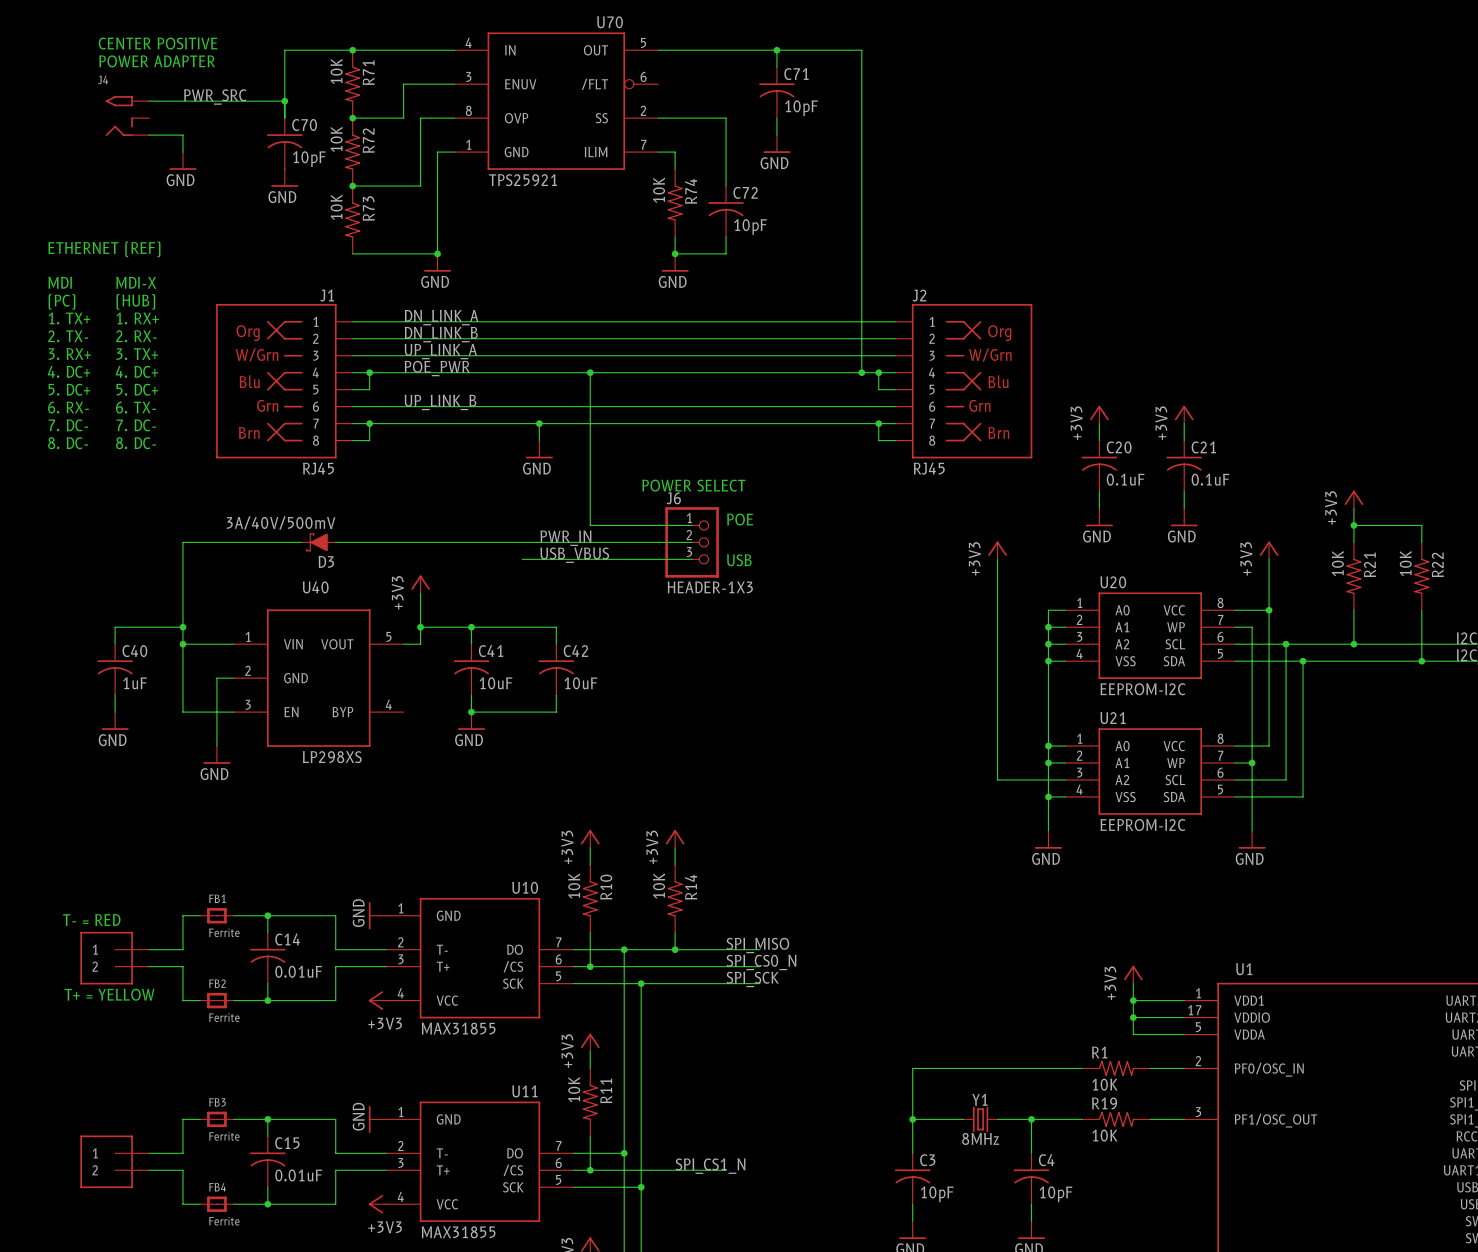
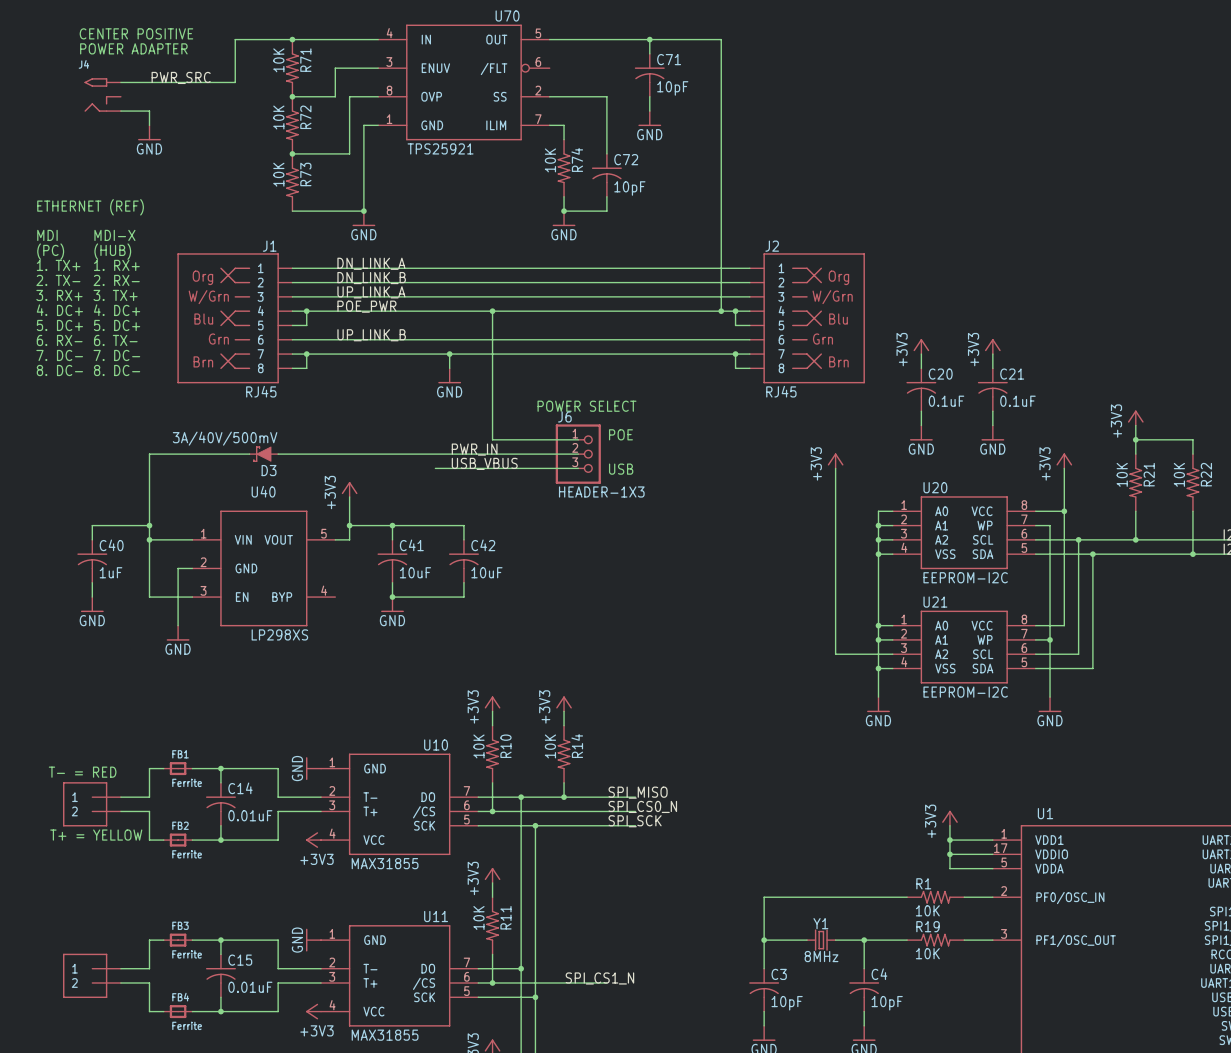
wire: (284, 101) (284, 118) -> none
junction: (284, 101) -> none
C70: 10pF (284, 143) -> none
power symbol: GND (284, 177) -> none

